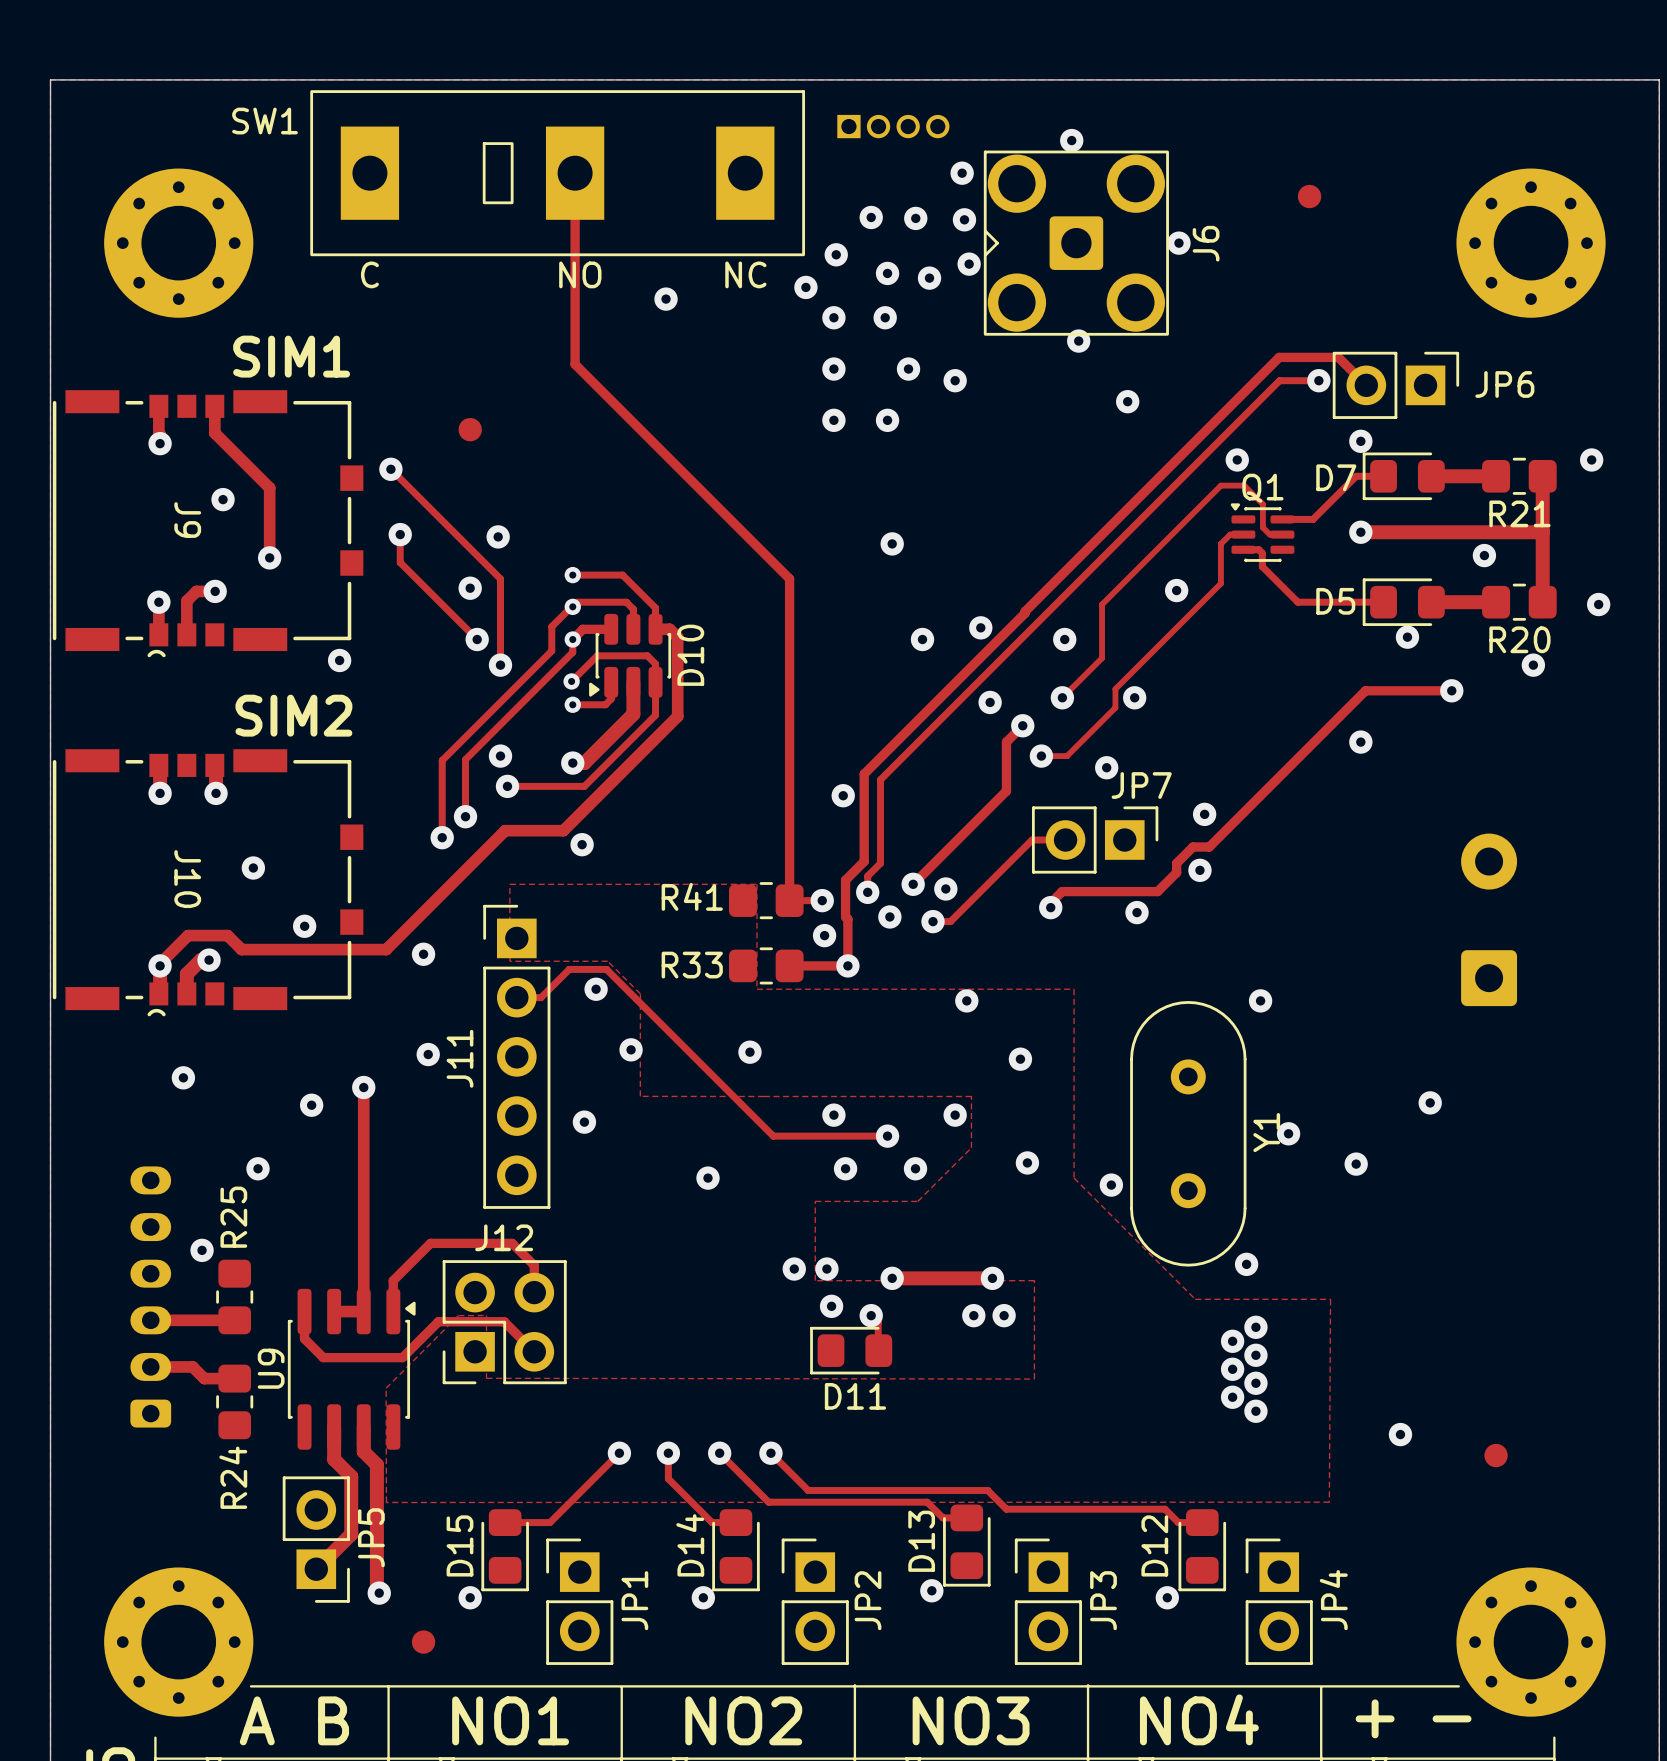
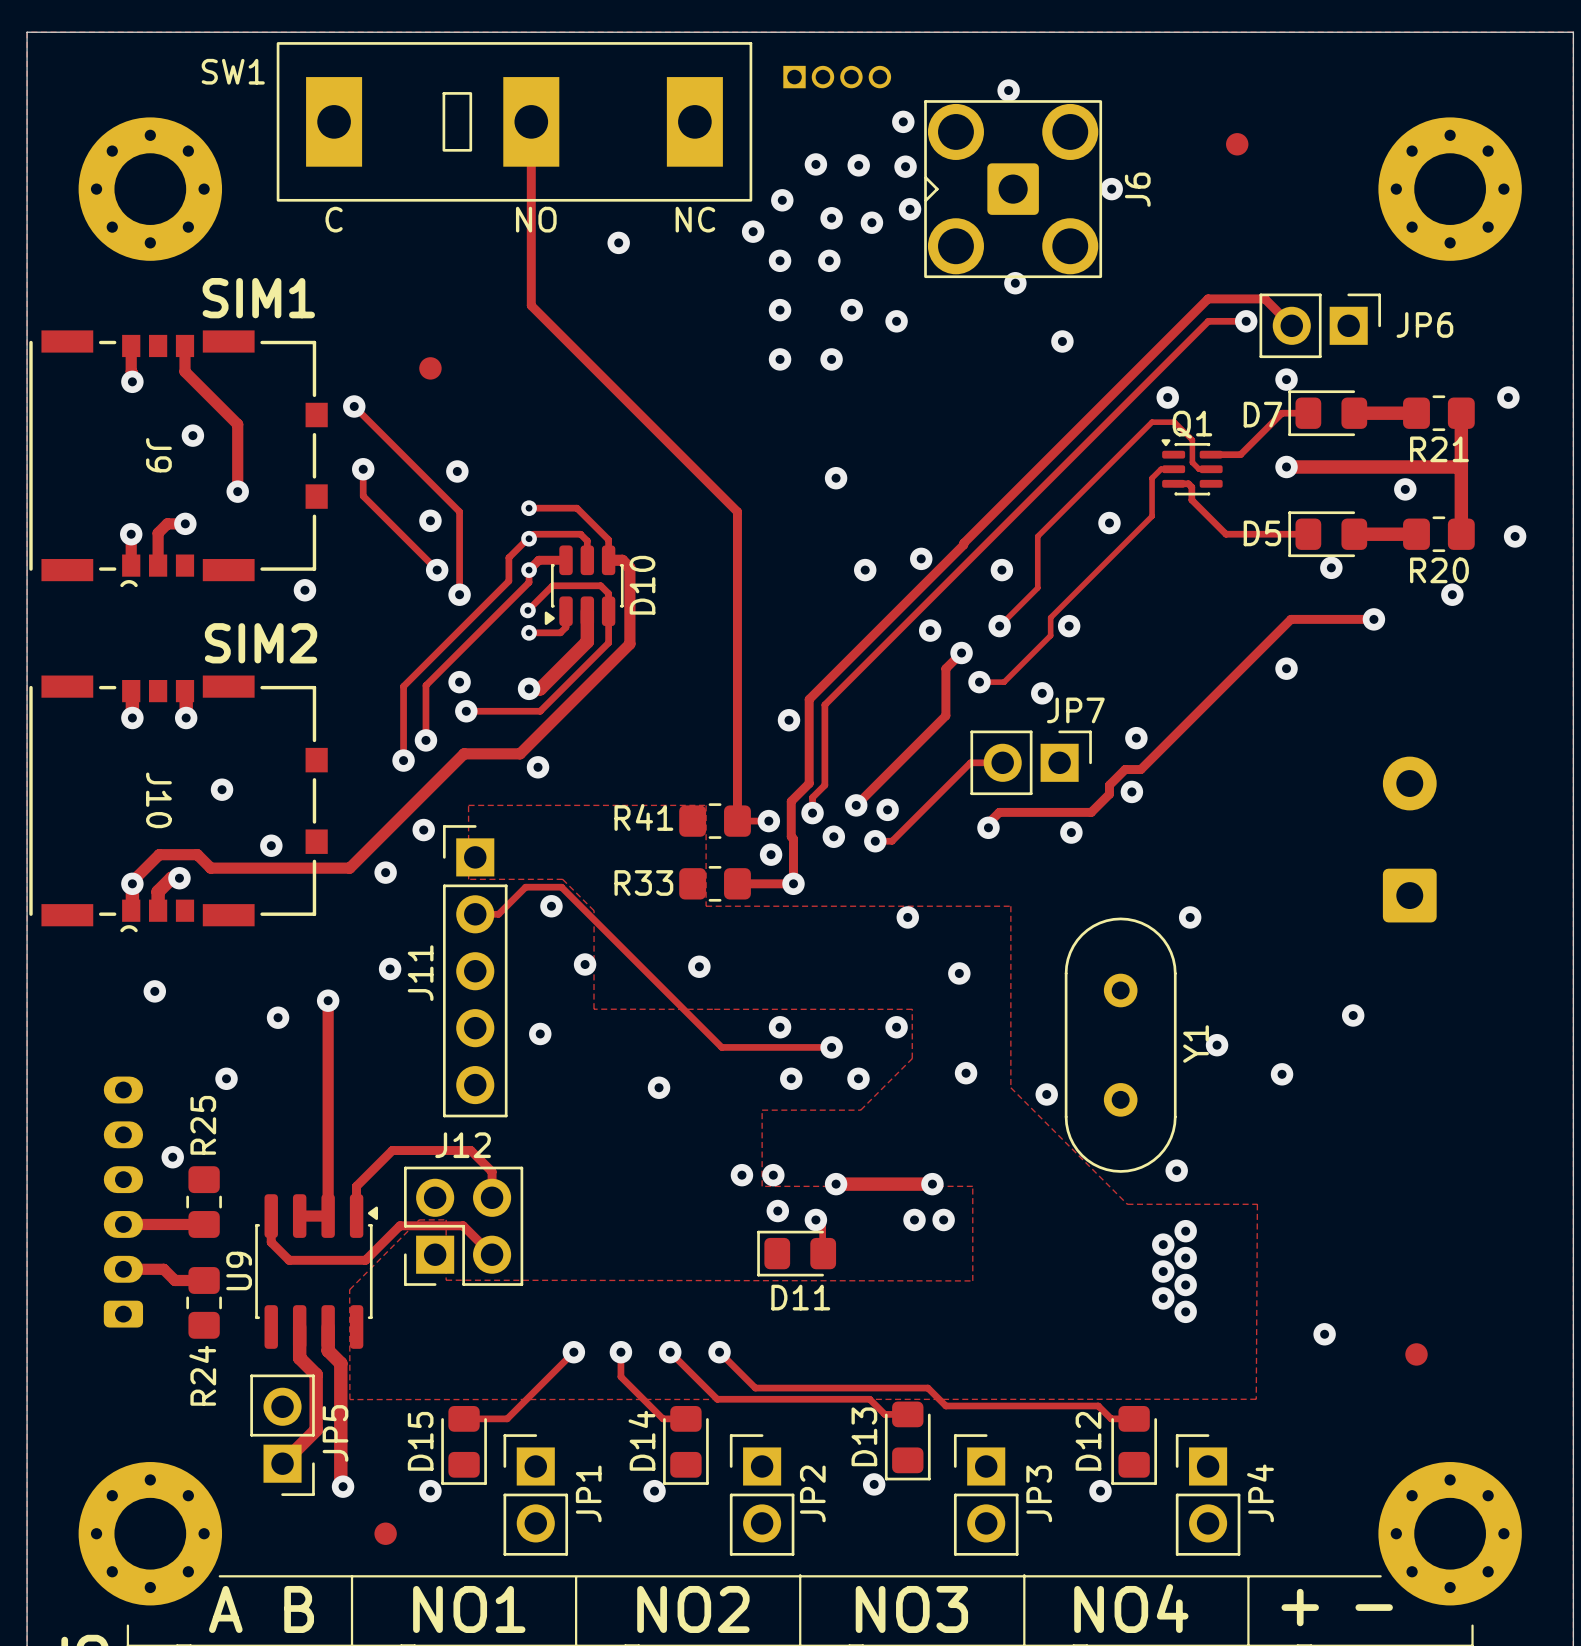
via: none -> (423, 830)

